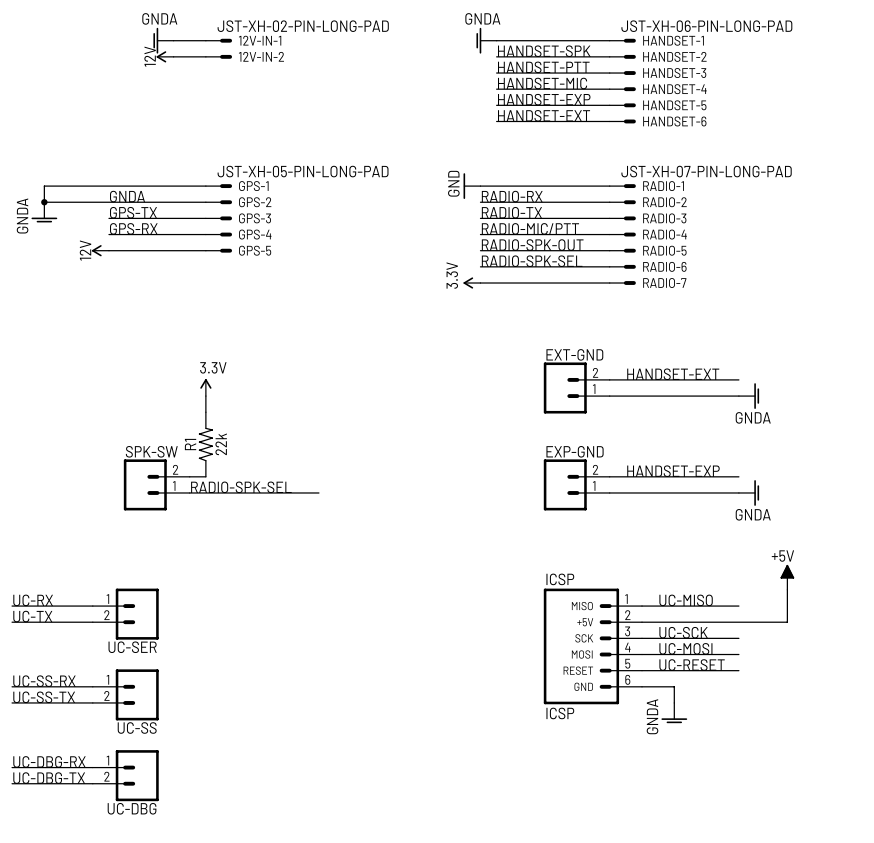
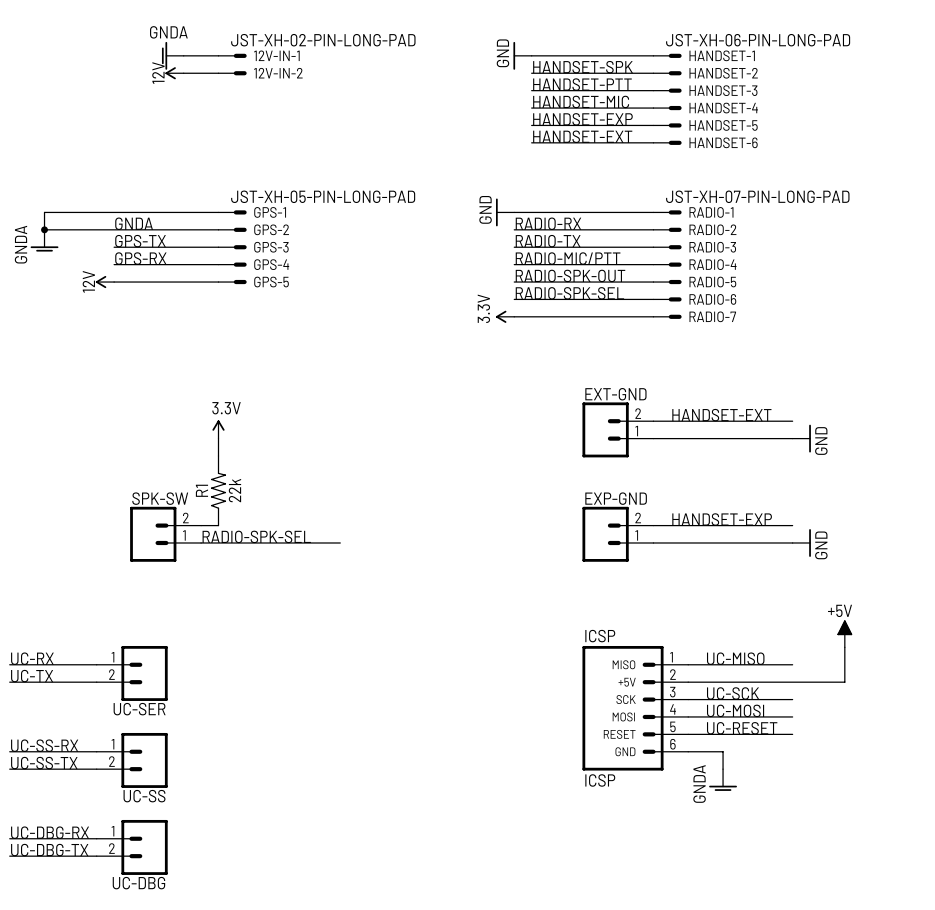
power symbol: GNDA (486, 40) -> GND (522, 55)
power symbol: GNDA (749, 396) -> GND (801, 438)
power symbol: GNDA (749, 492) -> GND (801, 542)

